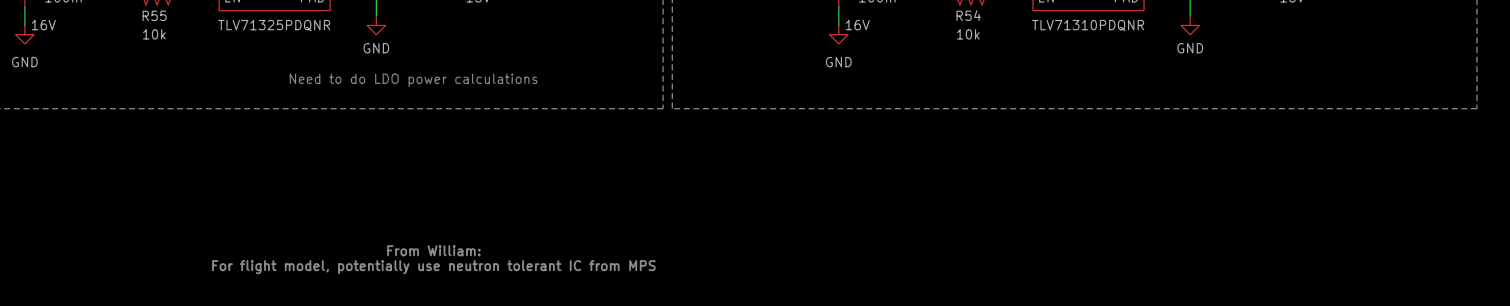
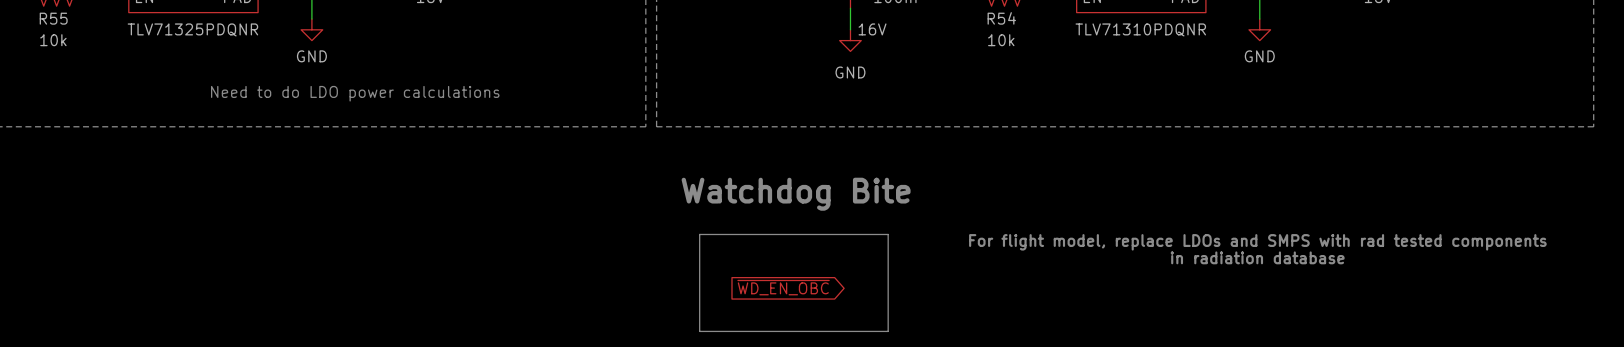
text: none -> Watchdog Bite (796, 194)
line: none -> (699, 234) (888, 234) (888, 331) (699, 331) (699, 234)
text: none -> For flight model, replace LDOs and SMPS with rad tested components (1257, 242)
text: none -> in radiation database (1257, 257)
global label: none -> ~{WD_EN_OBC} (783, 287)
text: From William: (433, 250) -> none
text: For flight model, potentially use neutron tolerant IC from MPS (433, 267) -> none

